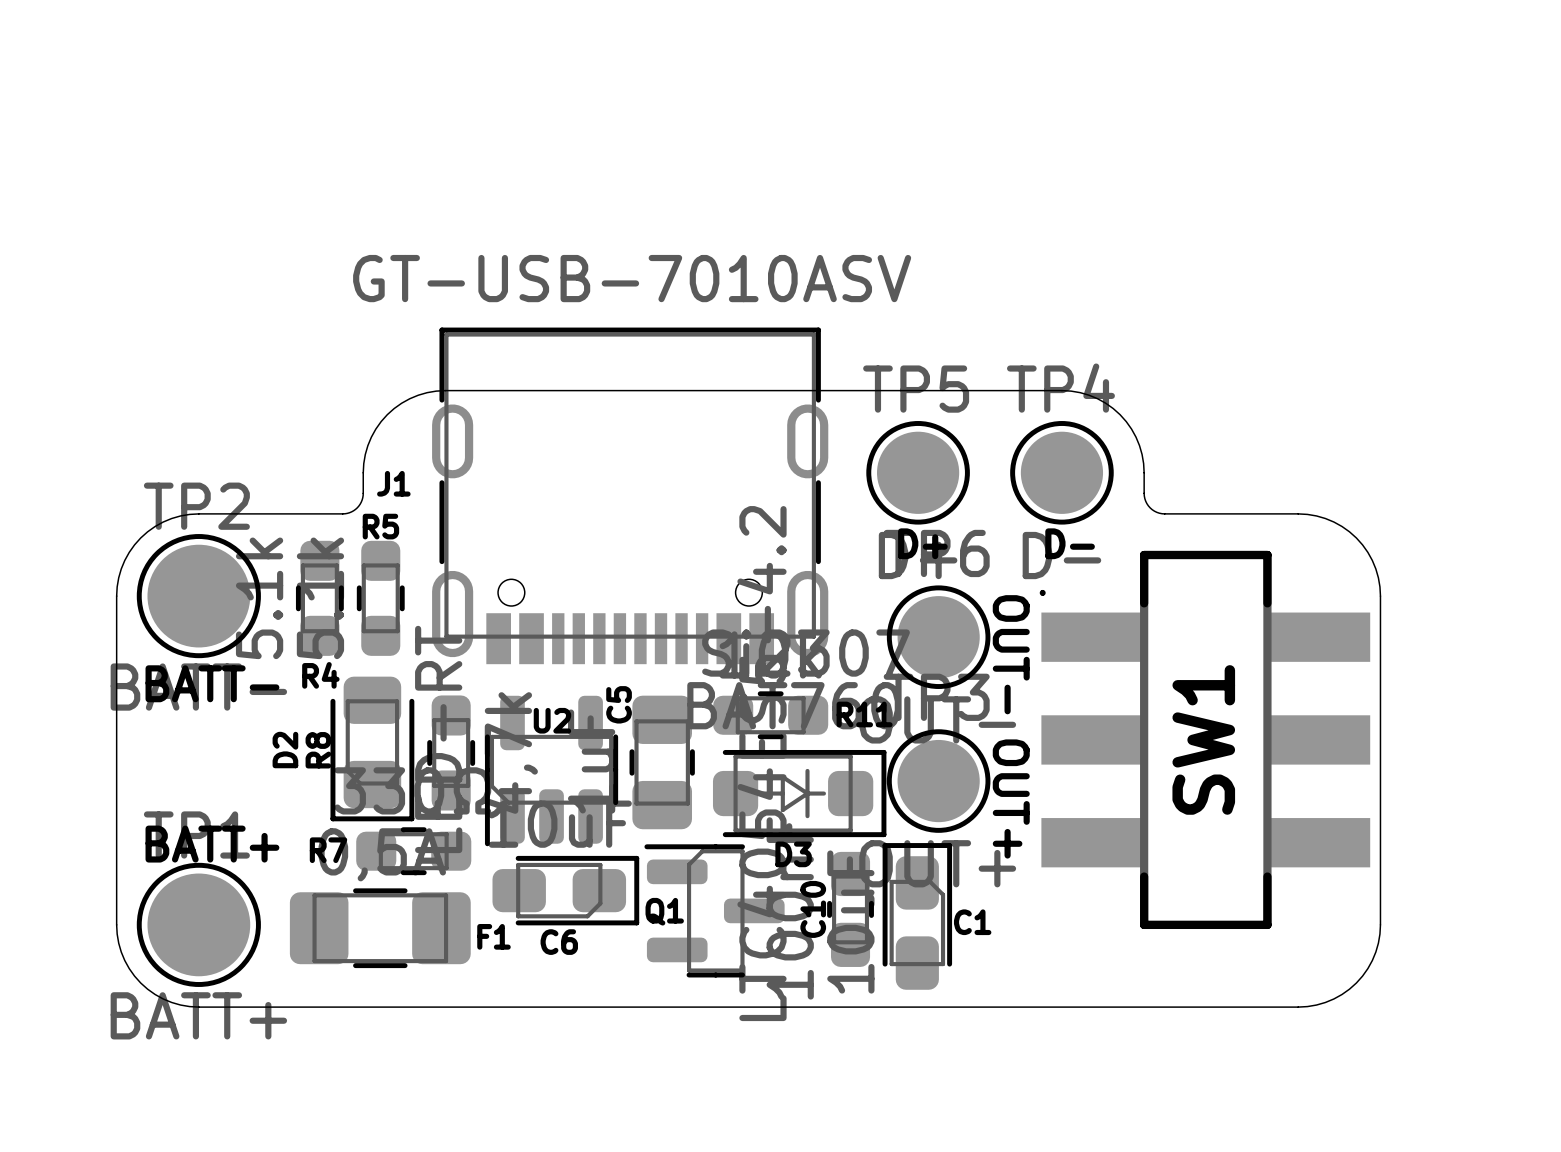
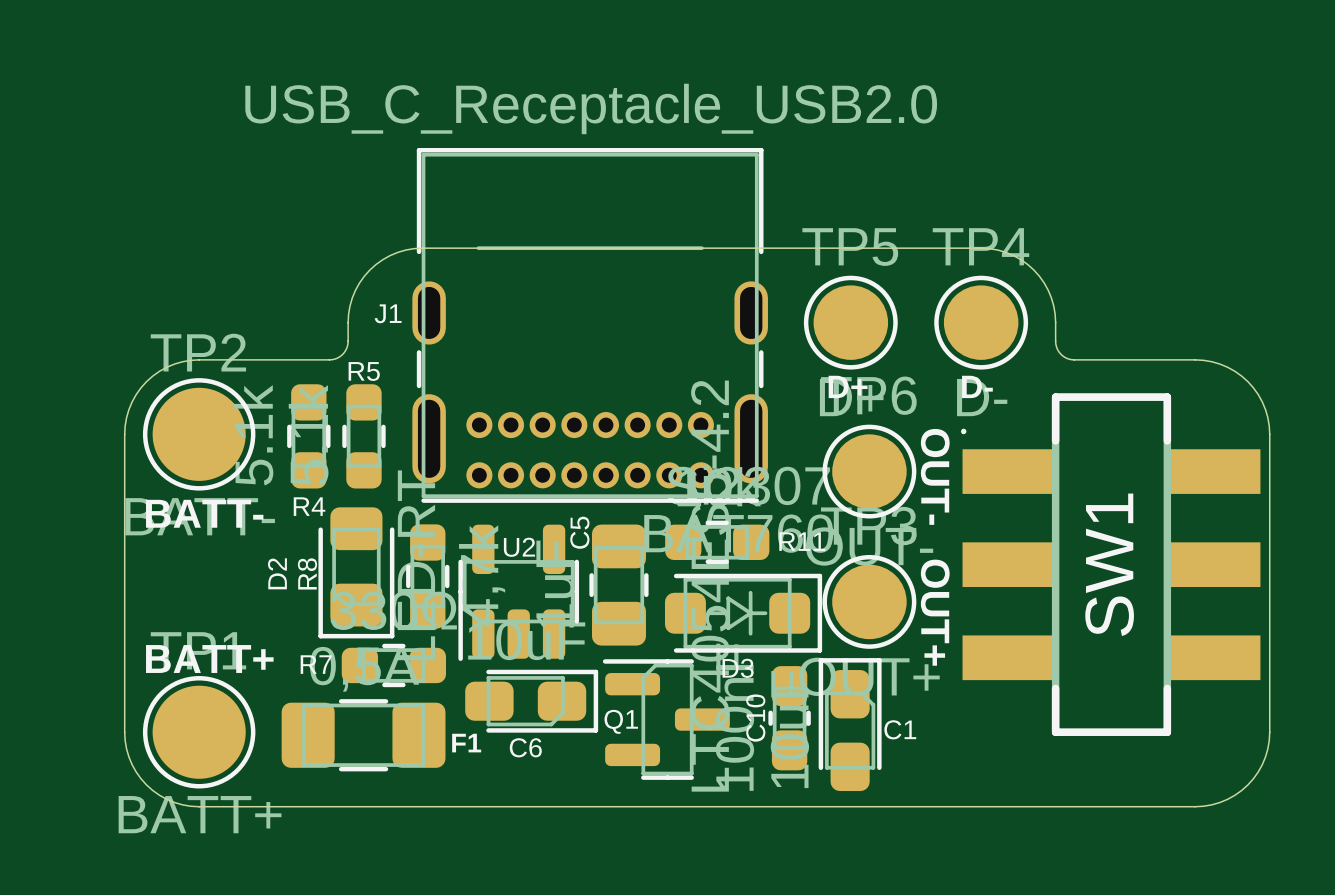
J1 value: GT-USB-7010ASV (632, 278) -> USB_C_Receptacle_USB2.0 (591, 108)
J1 footprint: [432, 327, 829, 665] -> [412, 147, 768, 503]

